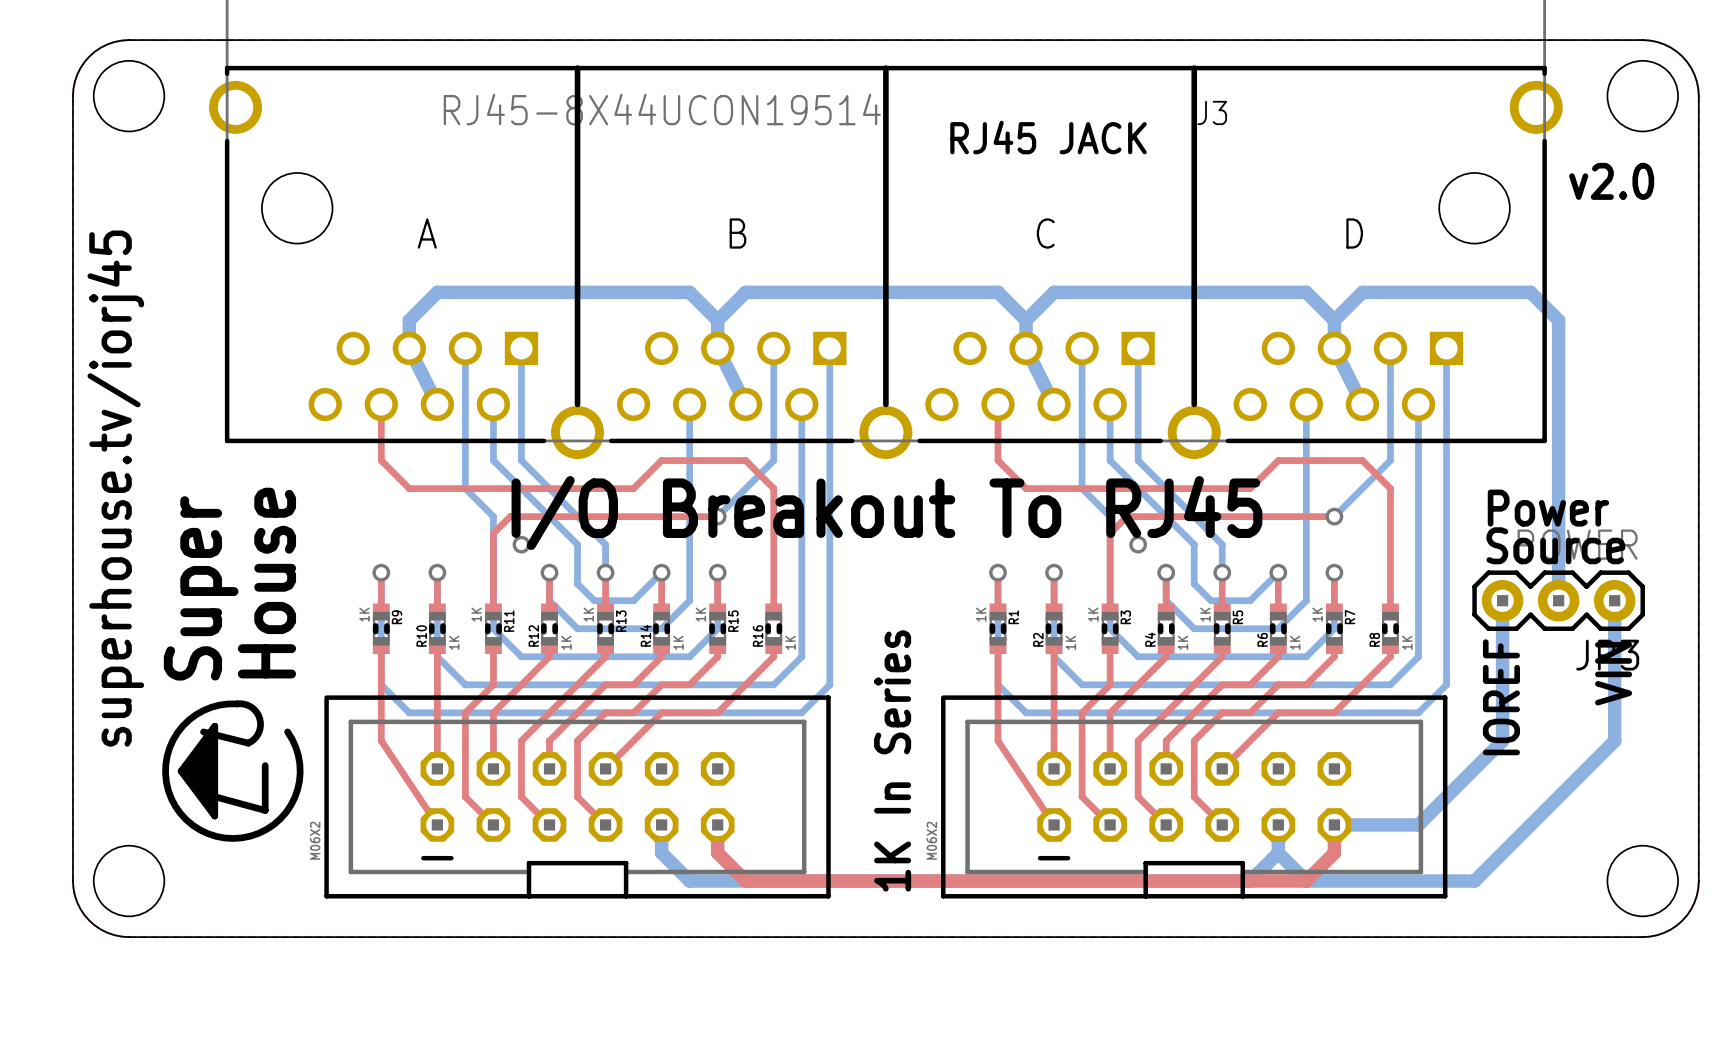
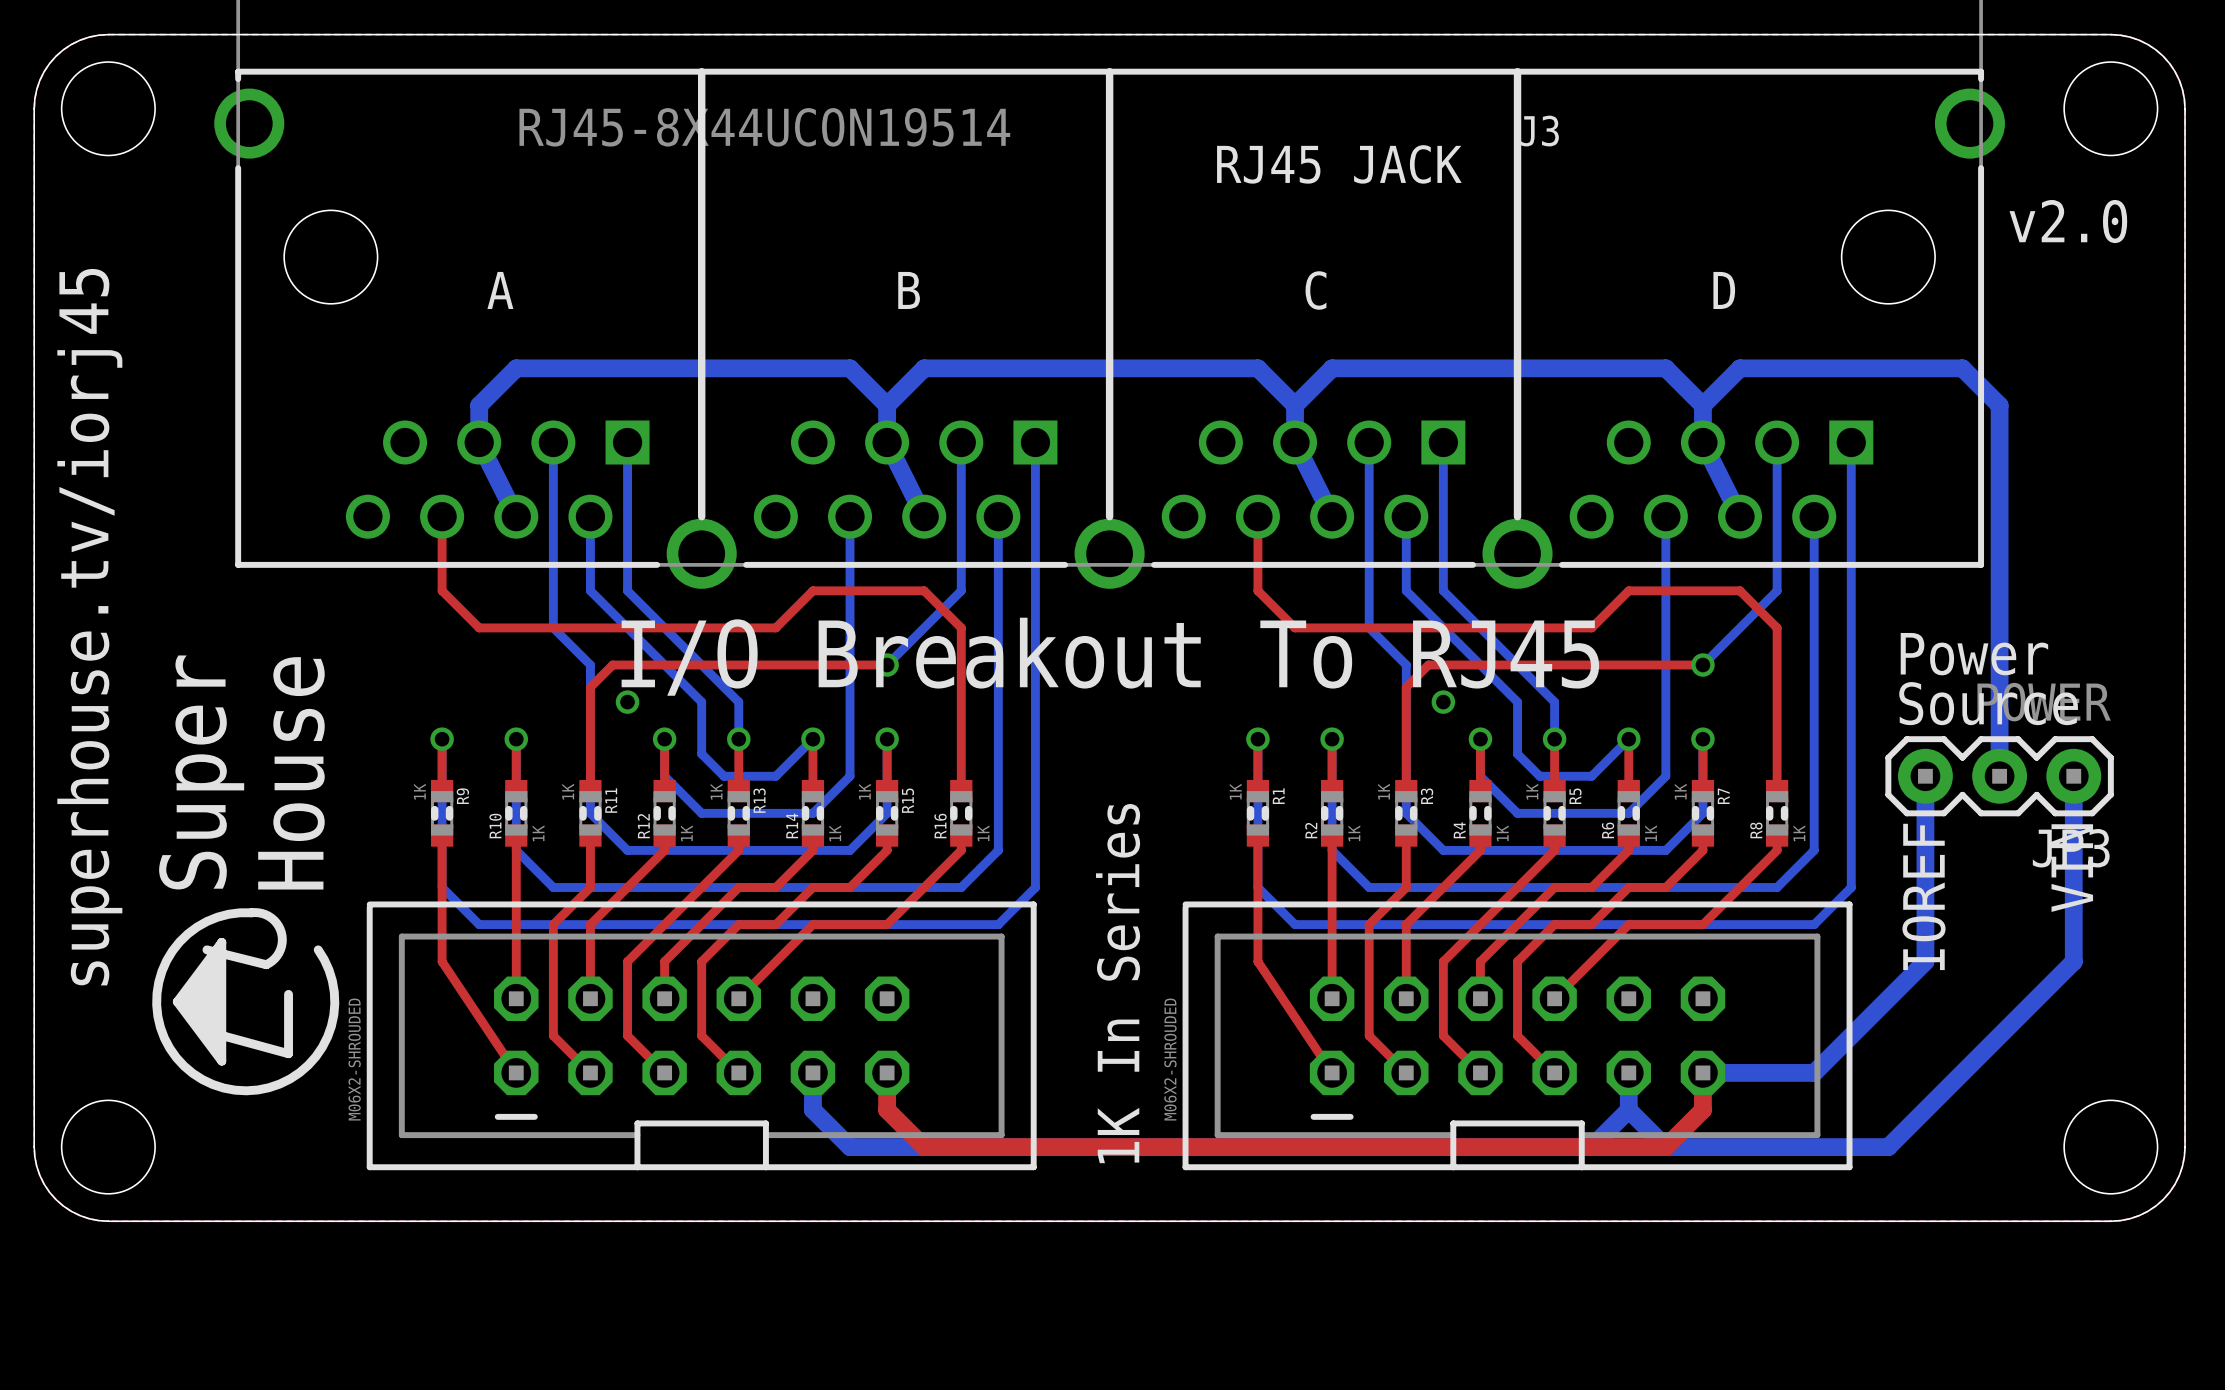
part value: M06X2 (315, 840) -> M06X2-SHROUDED (354, 1059)
part value: M06X2 (931, 840) -> M06X2-SHROUDED (1170, 1059)

